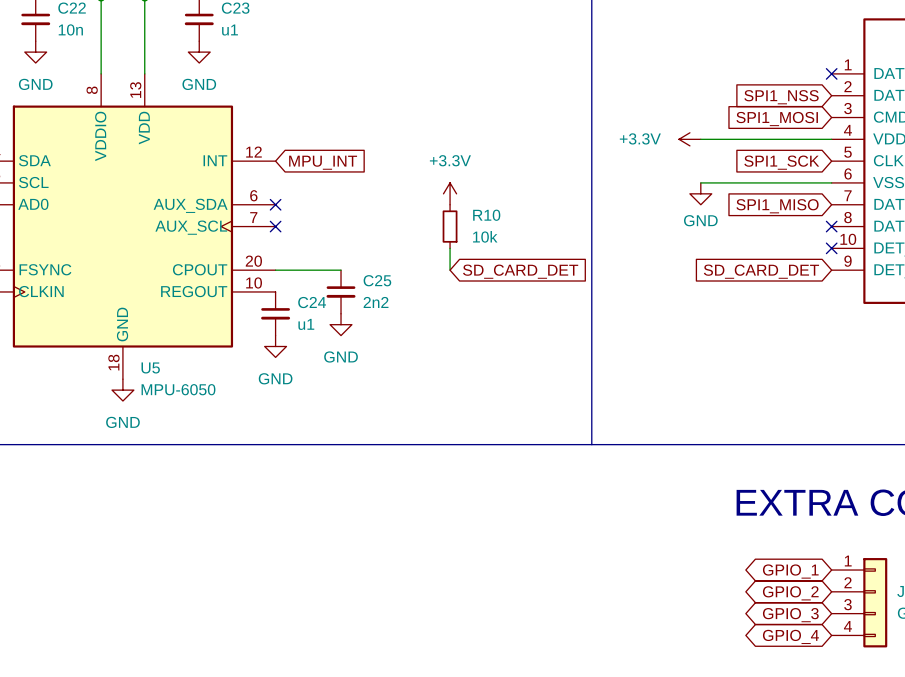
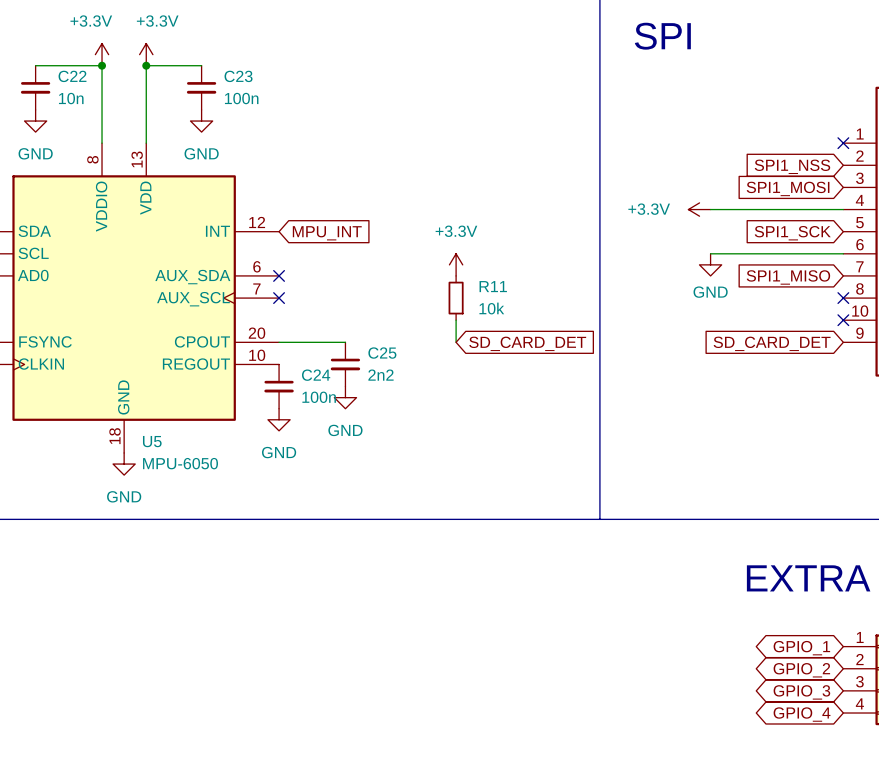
C23 value: u1 (230, 30) -> 100n (241, 98)
R10 name: R10 (486, 215) -> R11 (493, 286)
C24 value: u1 (306, 324) -> 100n (319, 397)

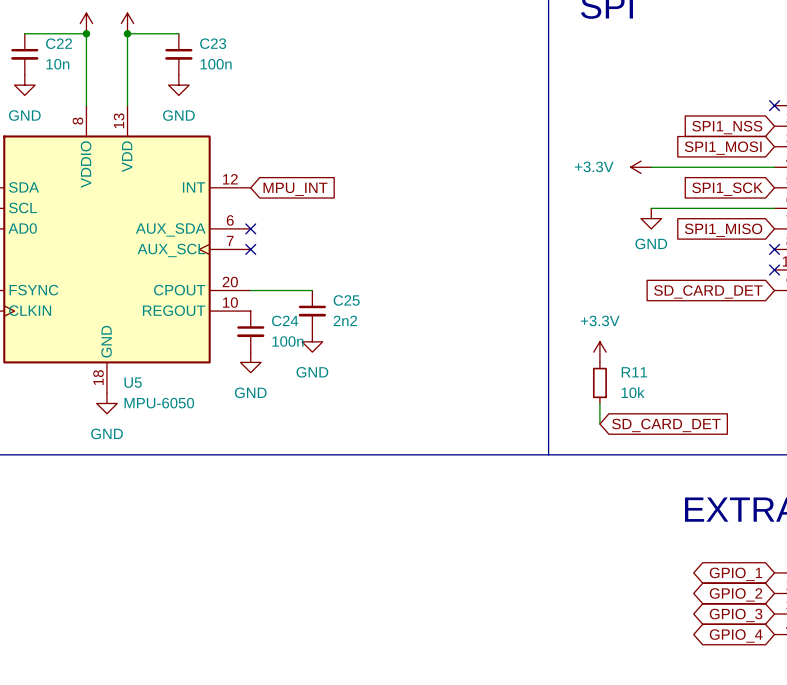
power symbol: +3.3V (456, 264) -> none
R11 position: (456, 298) -> (599, 382)
wire: (456, 320) (456, 342) -> none
global label: SD_CARD_DET (527, 343) -> none
power symbol: none -> +3.3V (599, 352)
wire: none -> (599, 403) (599, 424)
global label: none -> SD_CARD_DET (666, 425)

